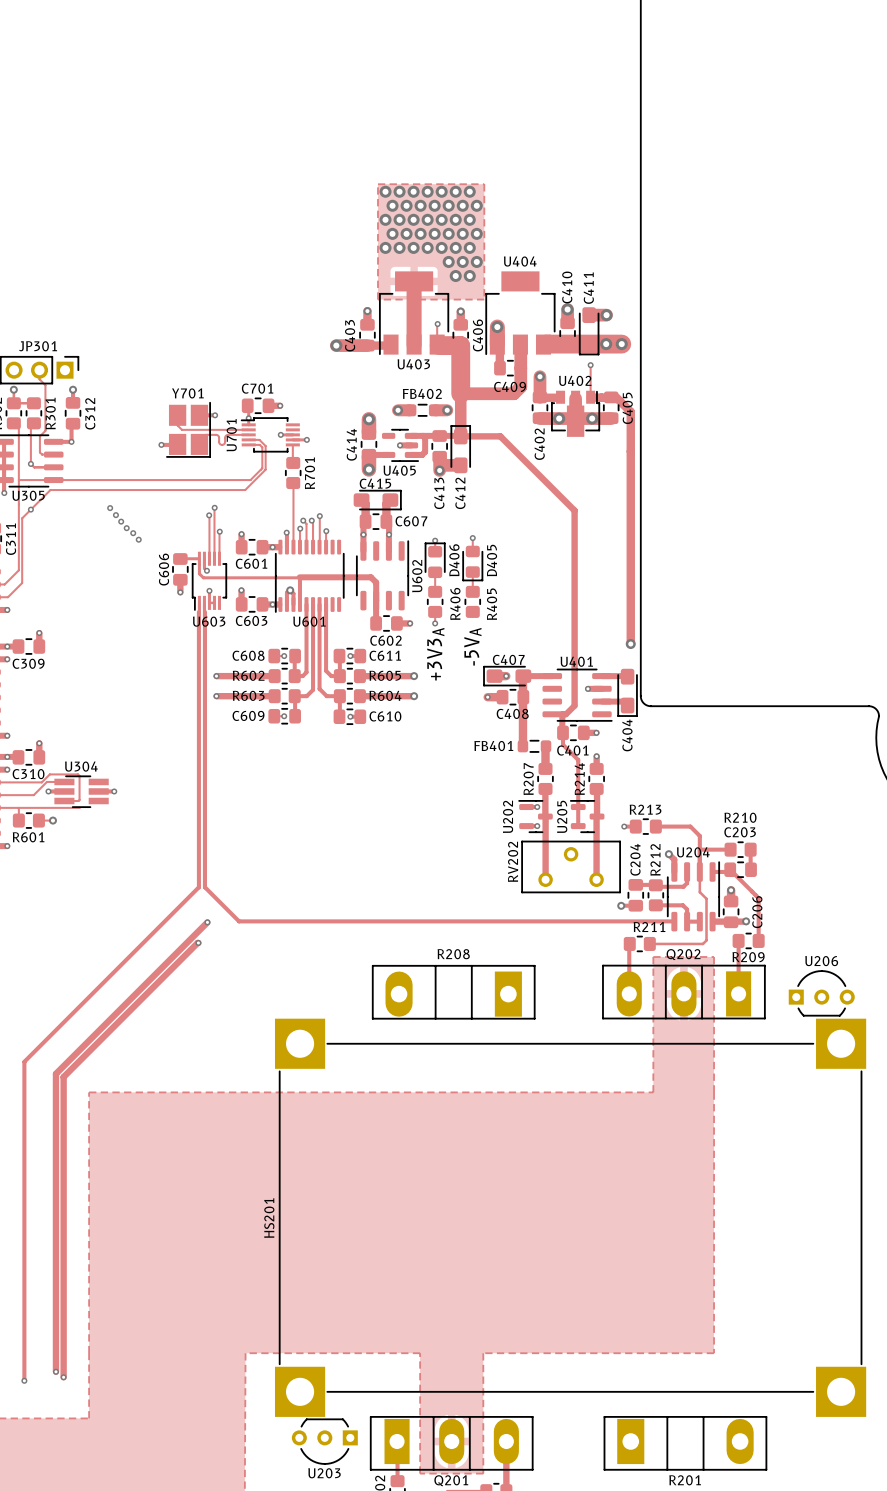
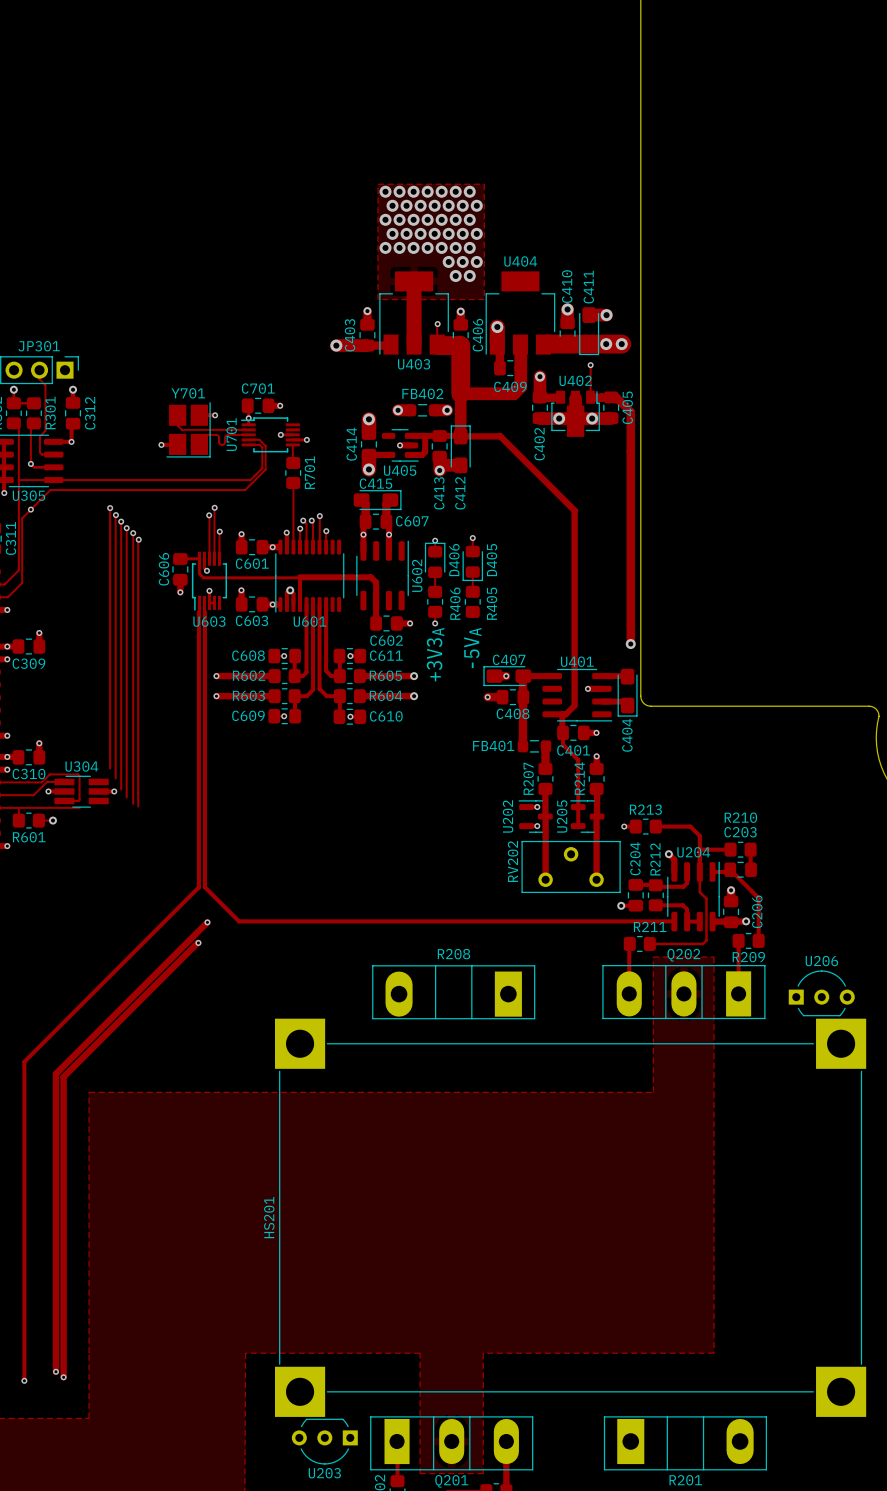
track: none -> (110, 508) (110, 768)
track: none -> (115, 515) (115, 778)
track: none -> (121, 521) (121, 789)
track: none -> (126, 528) (126, 797)
track: none -> (133, 533) (133, 804)
track: none -> (138, 540) (138, 806)

